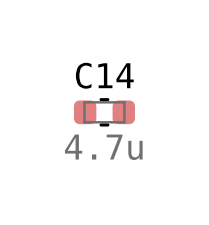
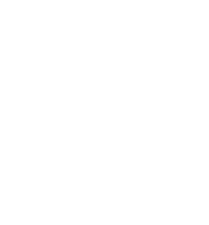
C14: 4.7u (104, 112) -> none

